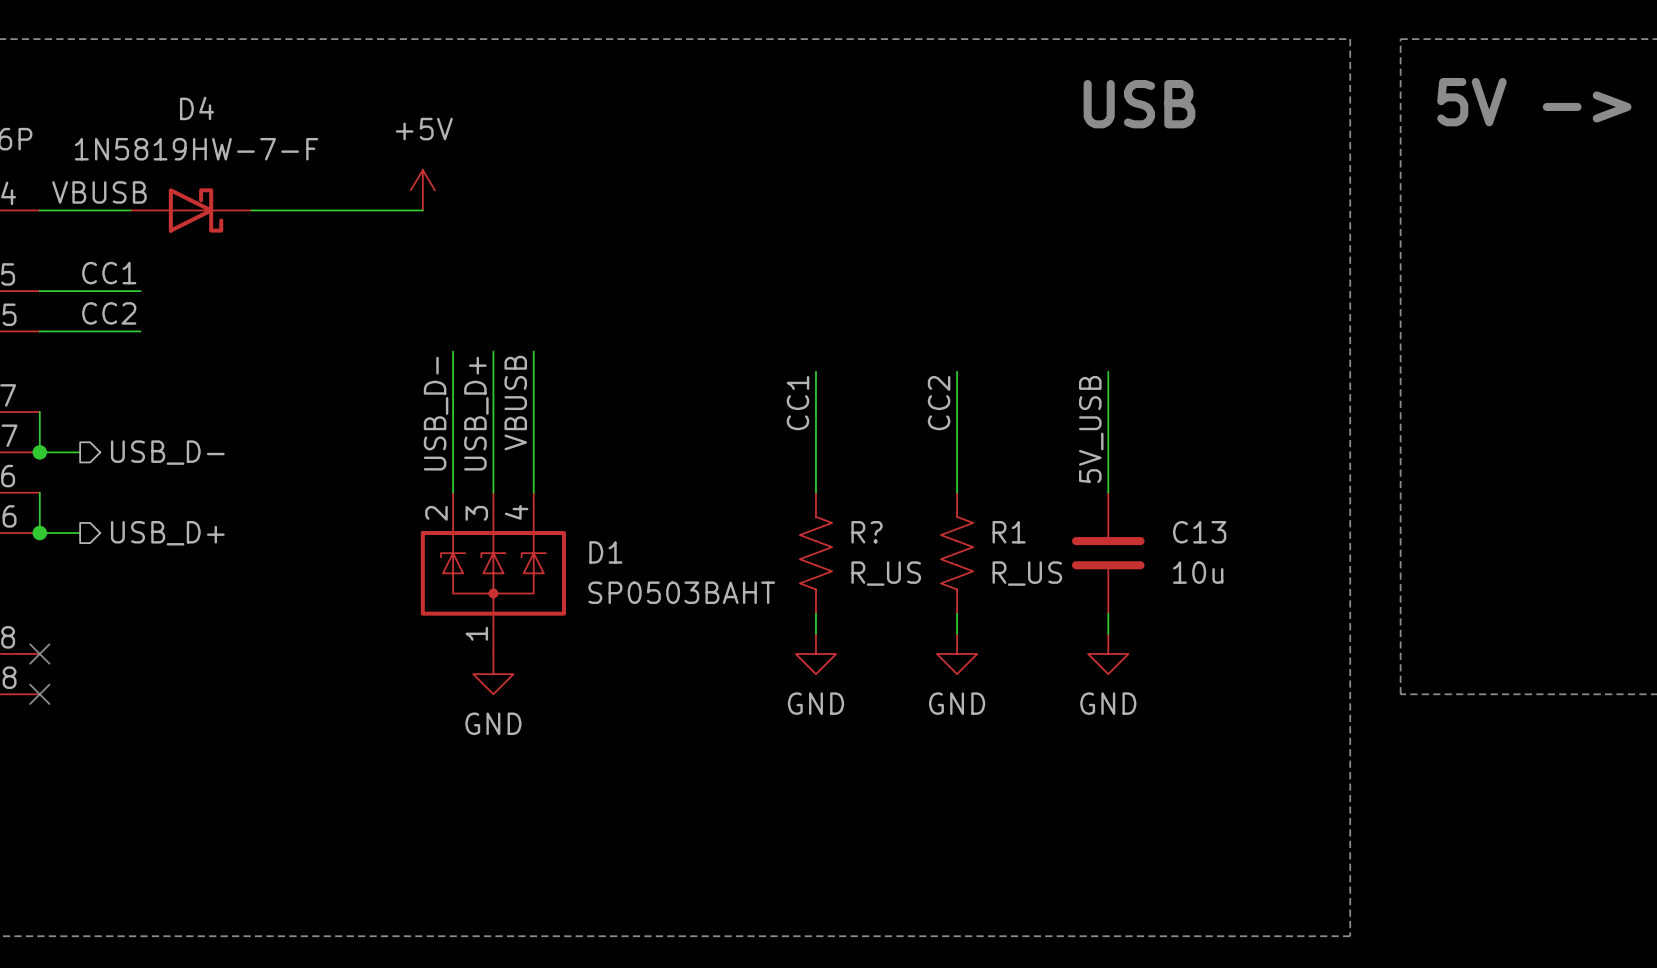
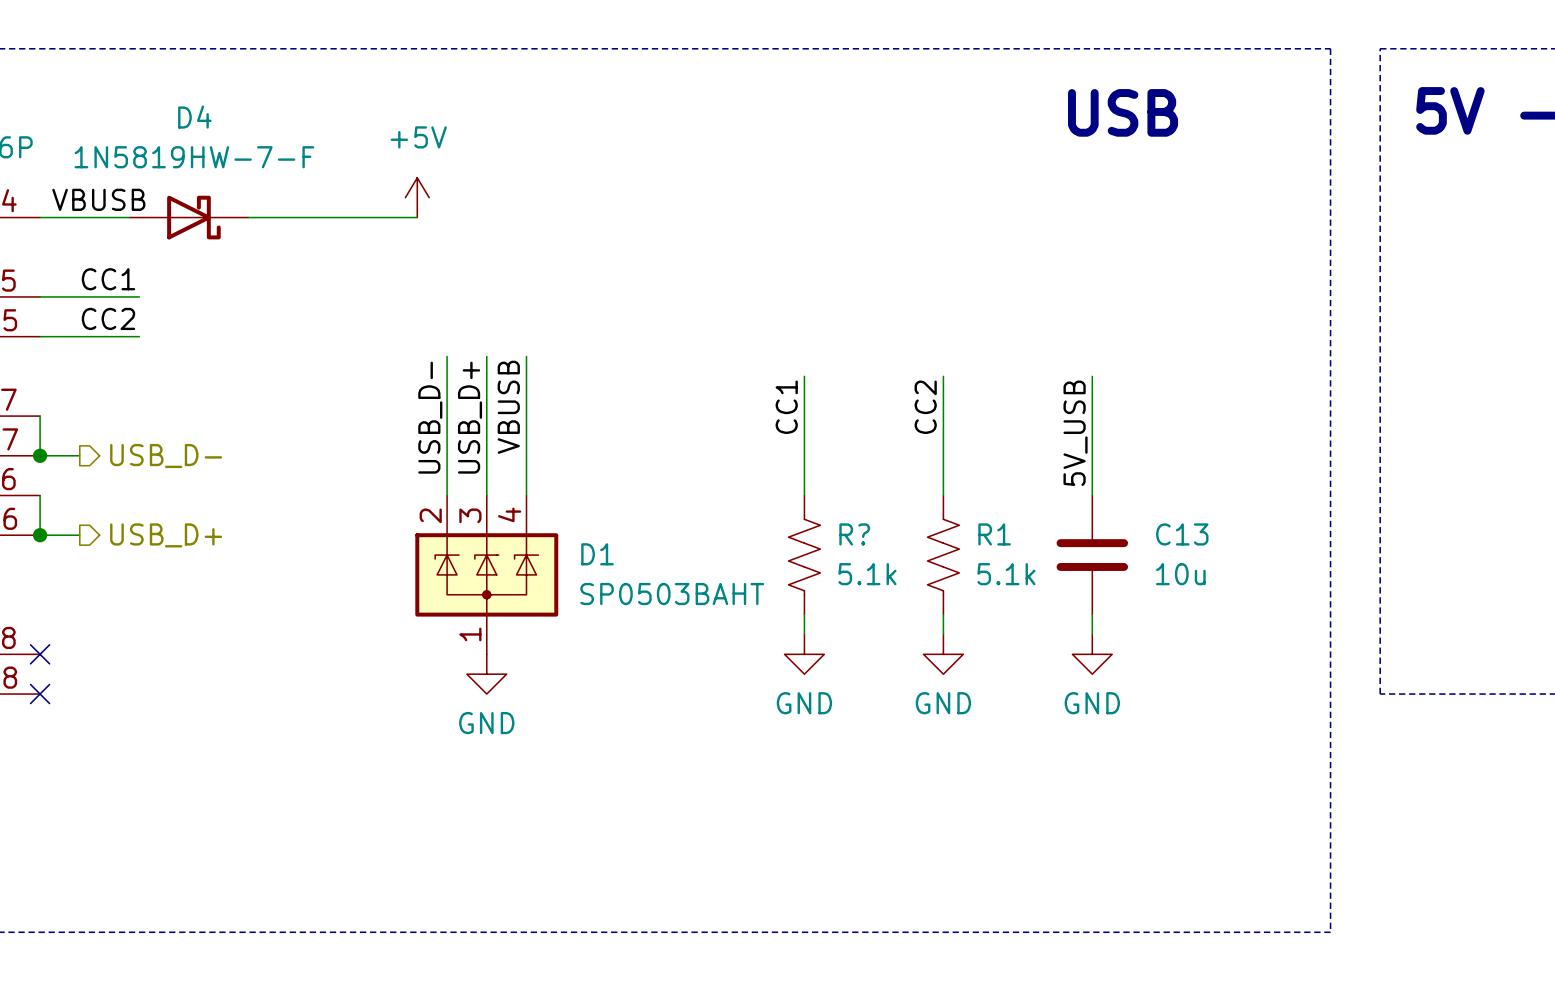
R? value: R_US (886, 573) -> 5.1k (867, 574)
R1 value: R_US (1027, 573) -> 5.1k (1006, 574)

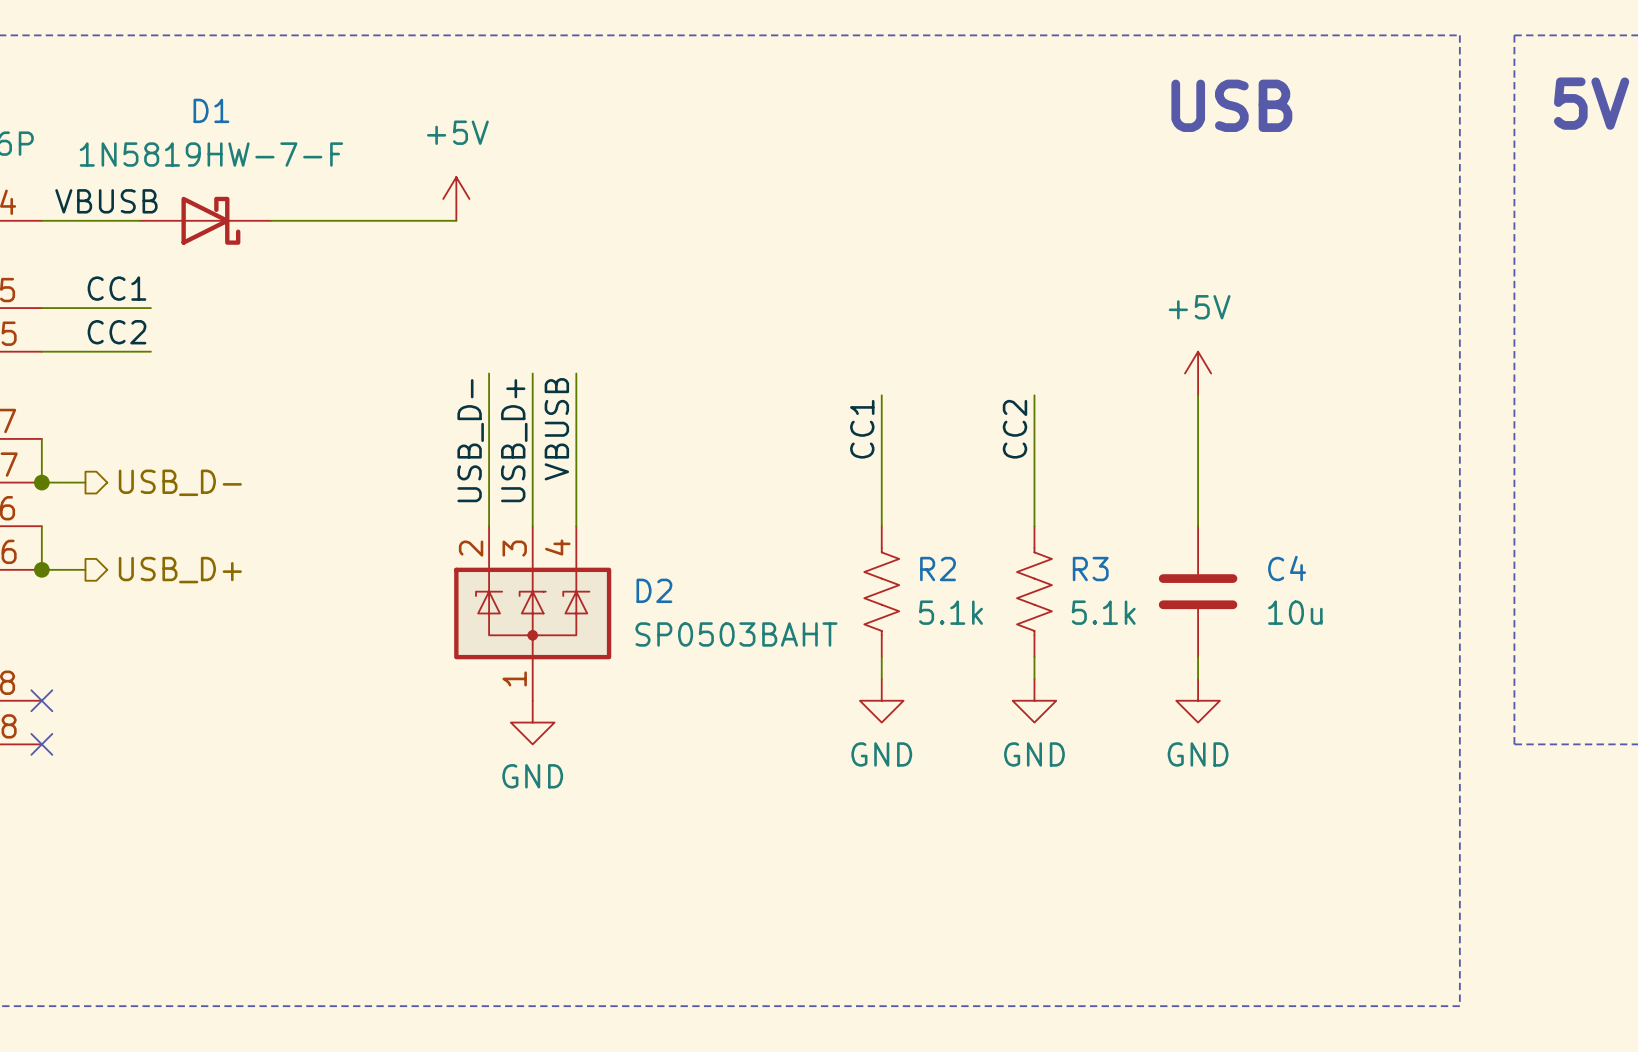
D4 name: D4 (194, 117) -> D1 (211, 110)
power symbol: none -> +5V (1198, 373)
label: 5V_USB (1075, 433) -> none
R? name: R? (854, 534) -> R2 (938, 569)
R1 name: R1 (994, 534) -> R3 (1090, 569)
C13 name: C13 (1182, 534) -> C4 (1287, 568)
D1 name: D1 (597, 554) -> D2 (654, 590)

